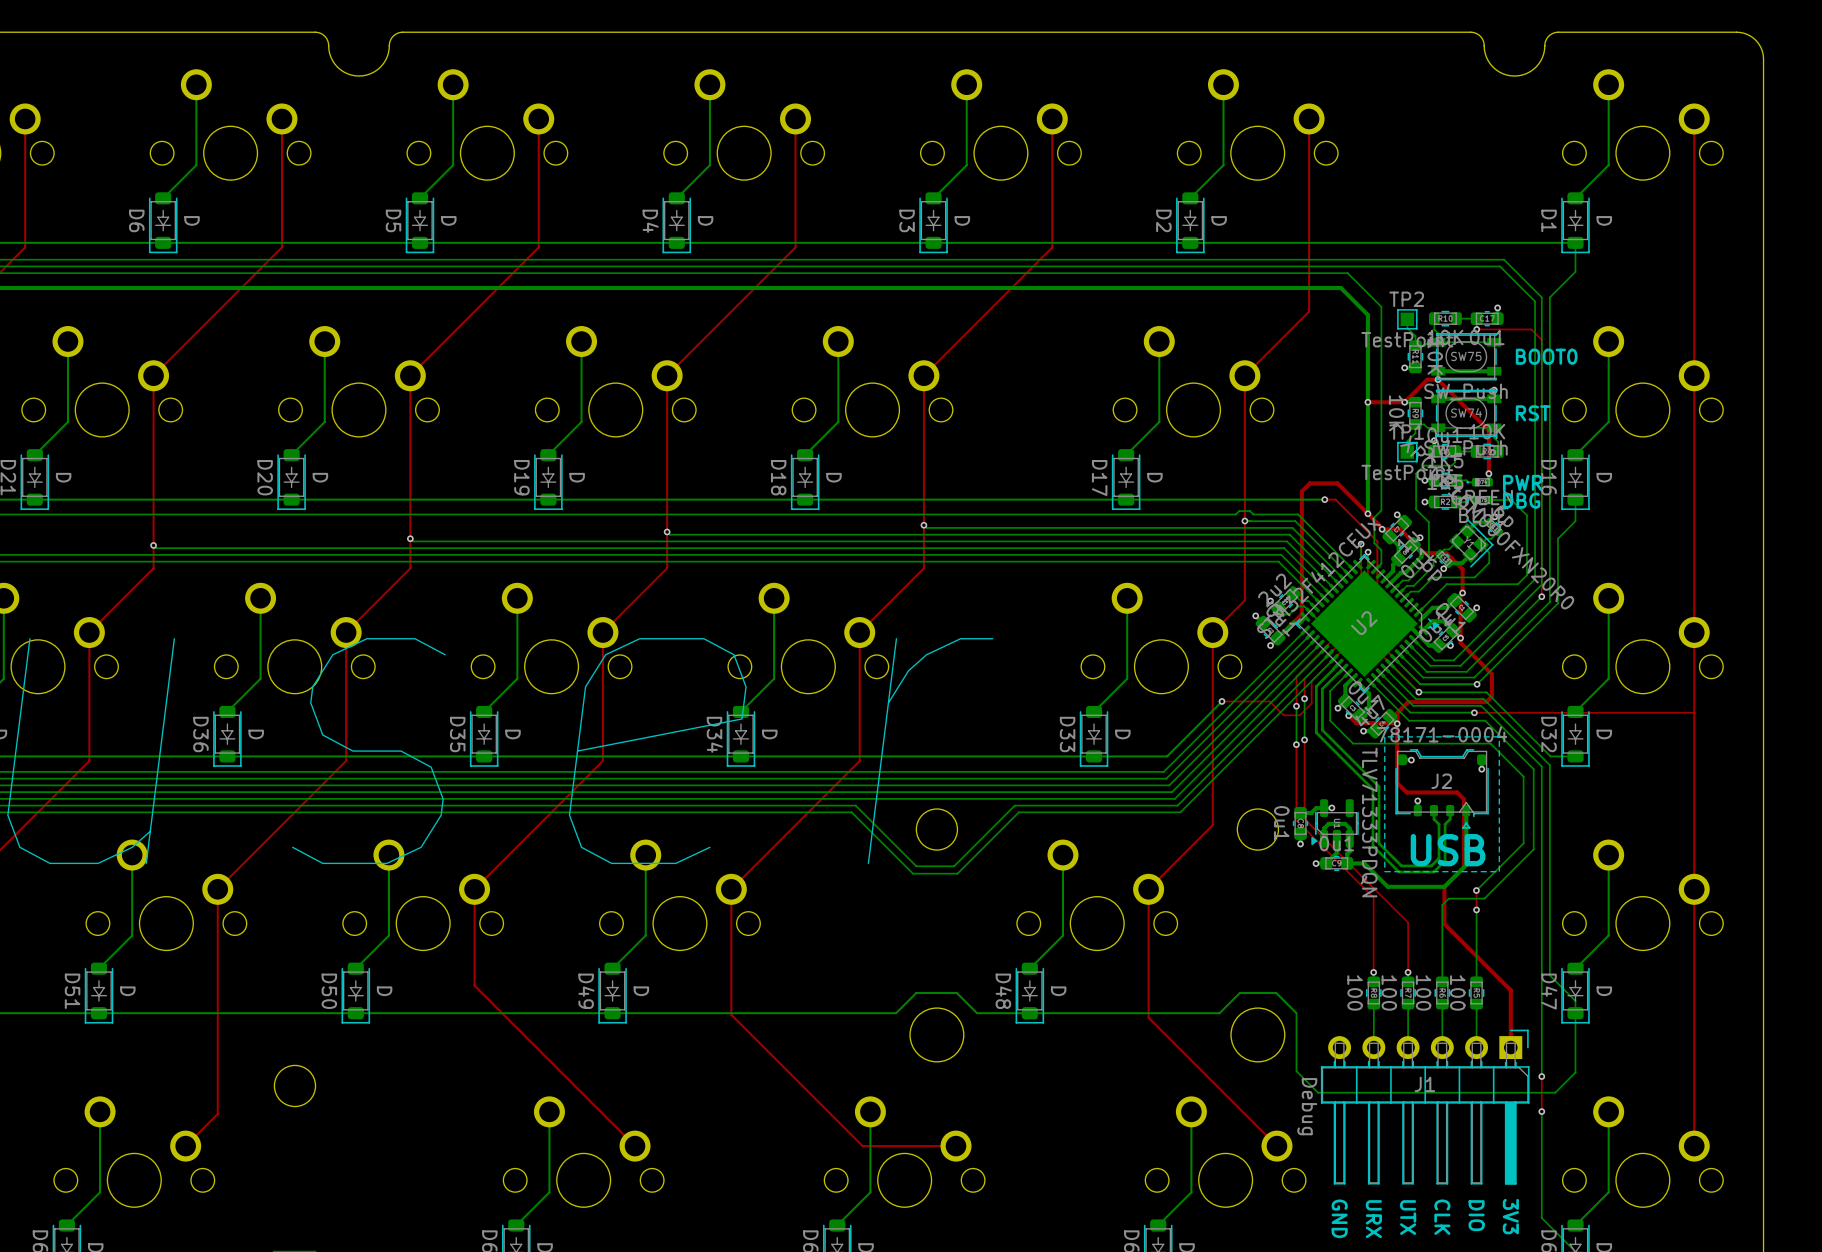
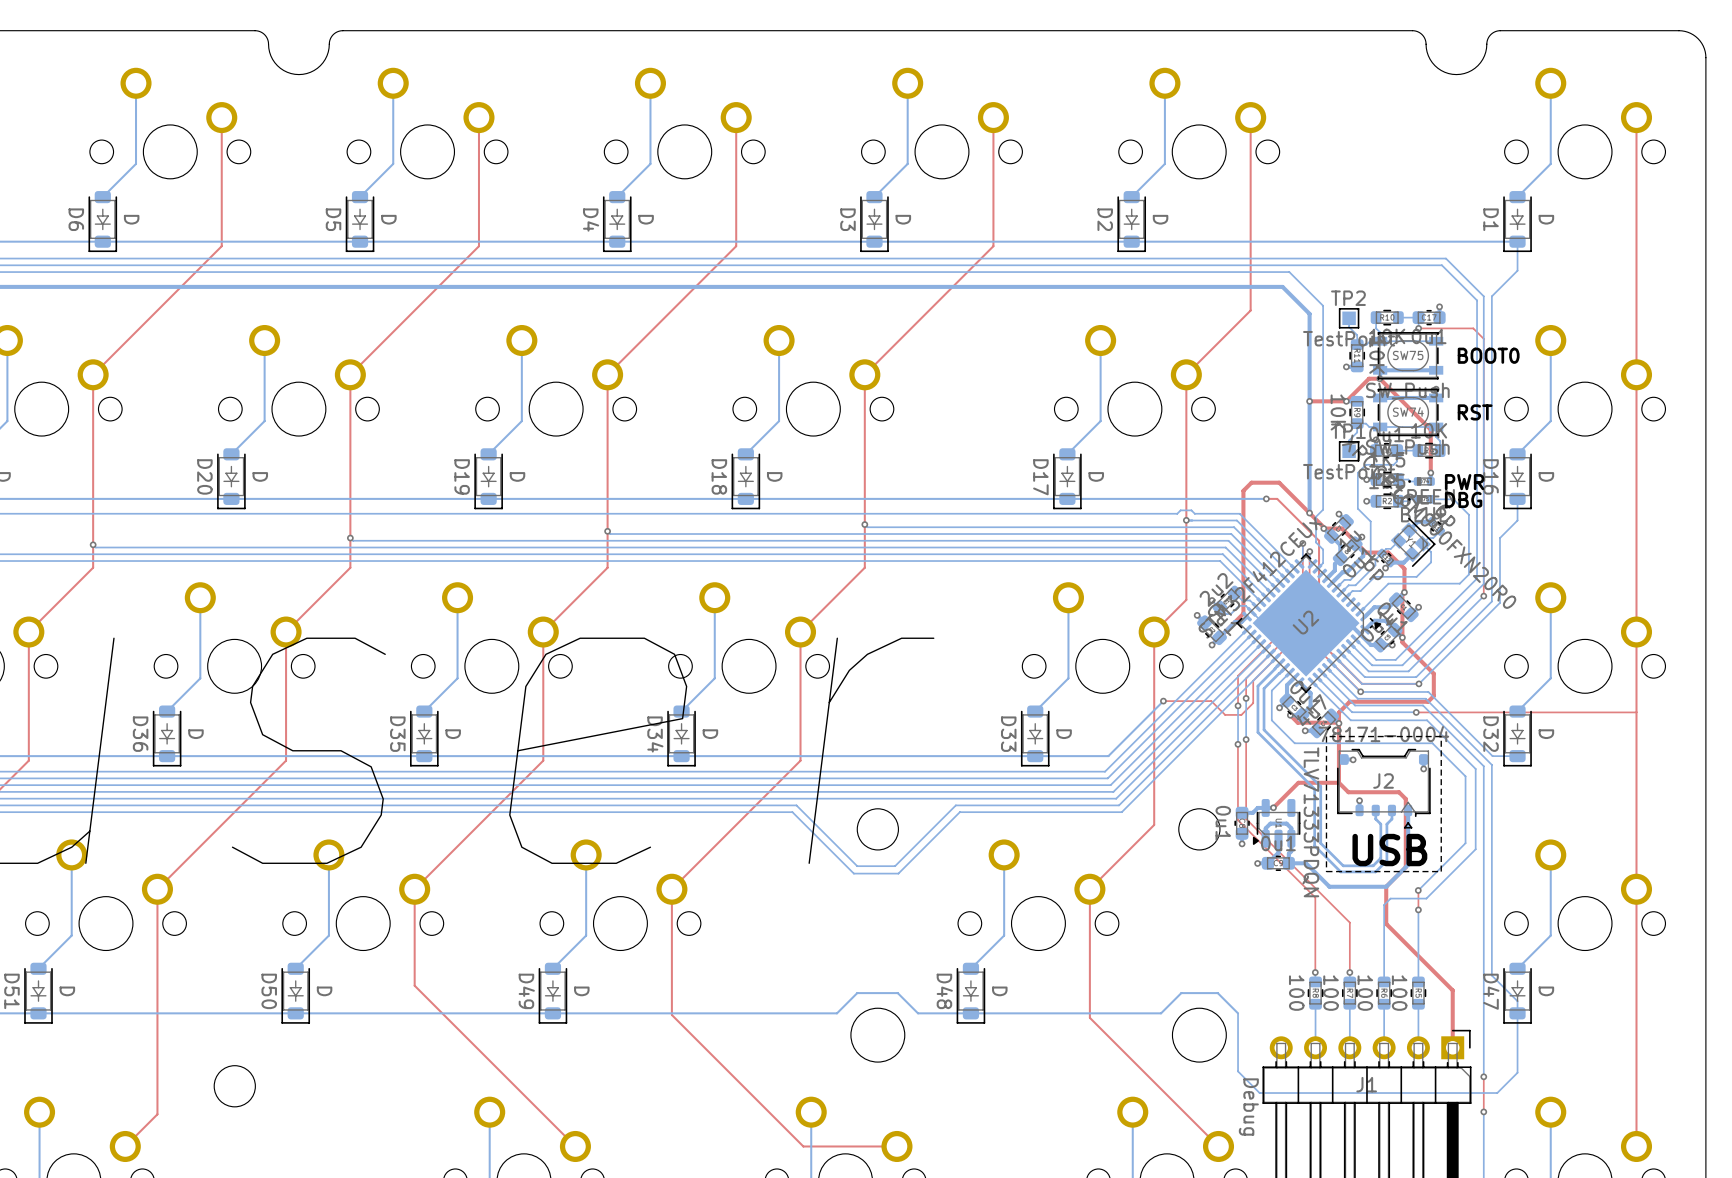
top track: none -> (1338, 782) (1298, 782) (1273, 807)

